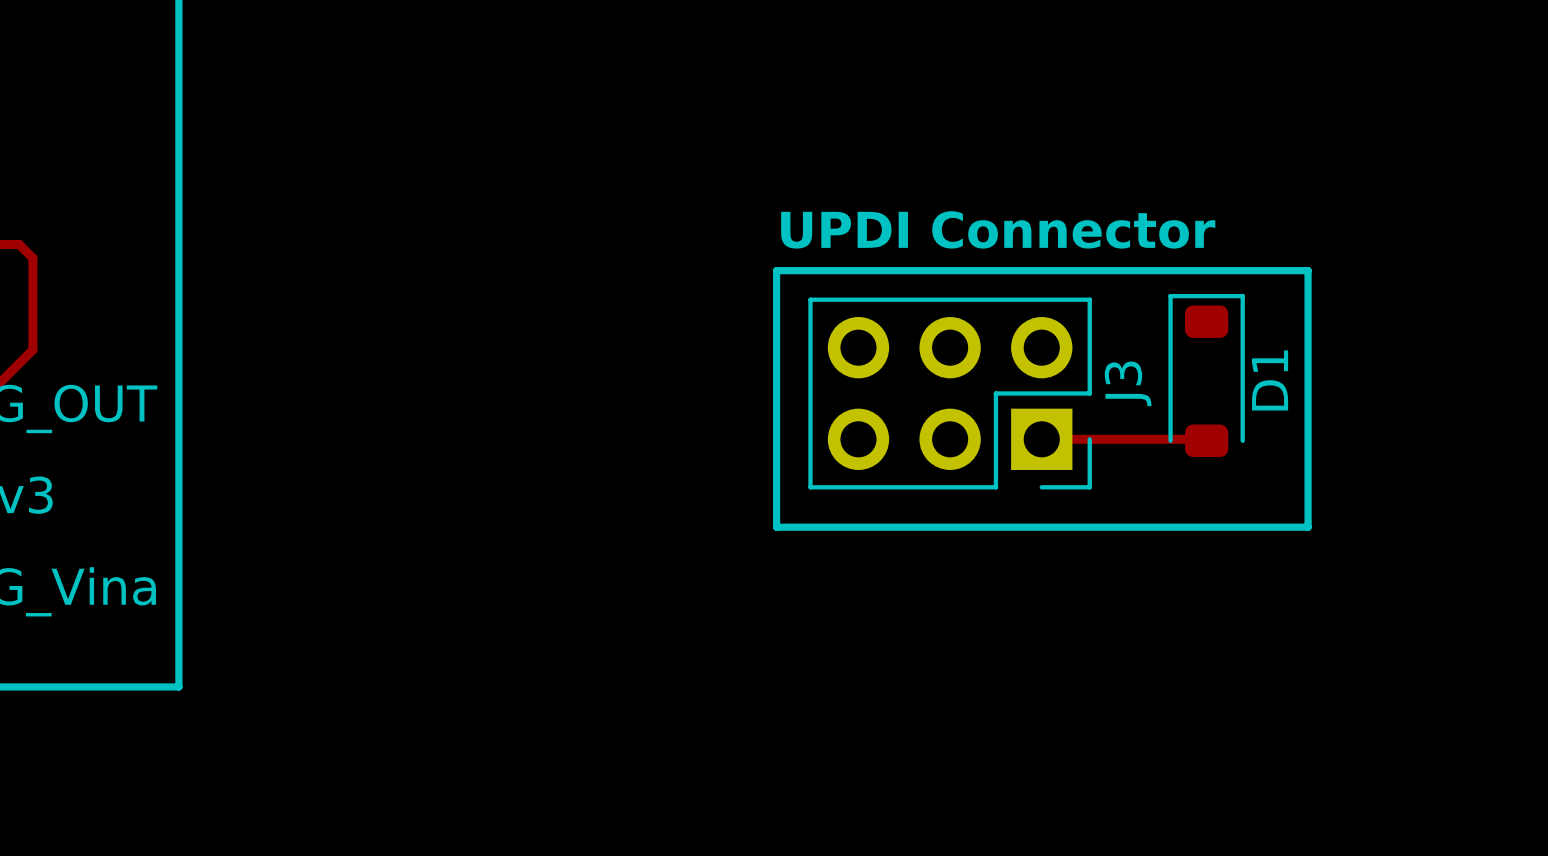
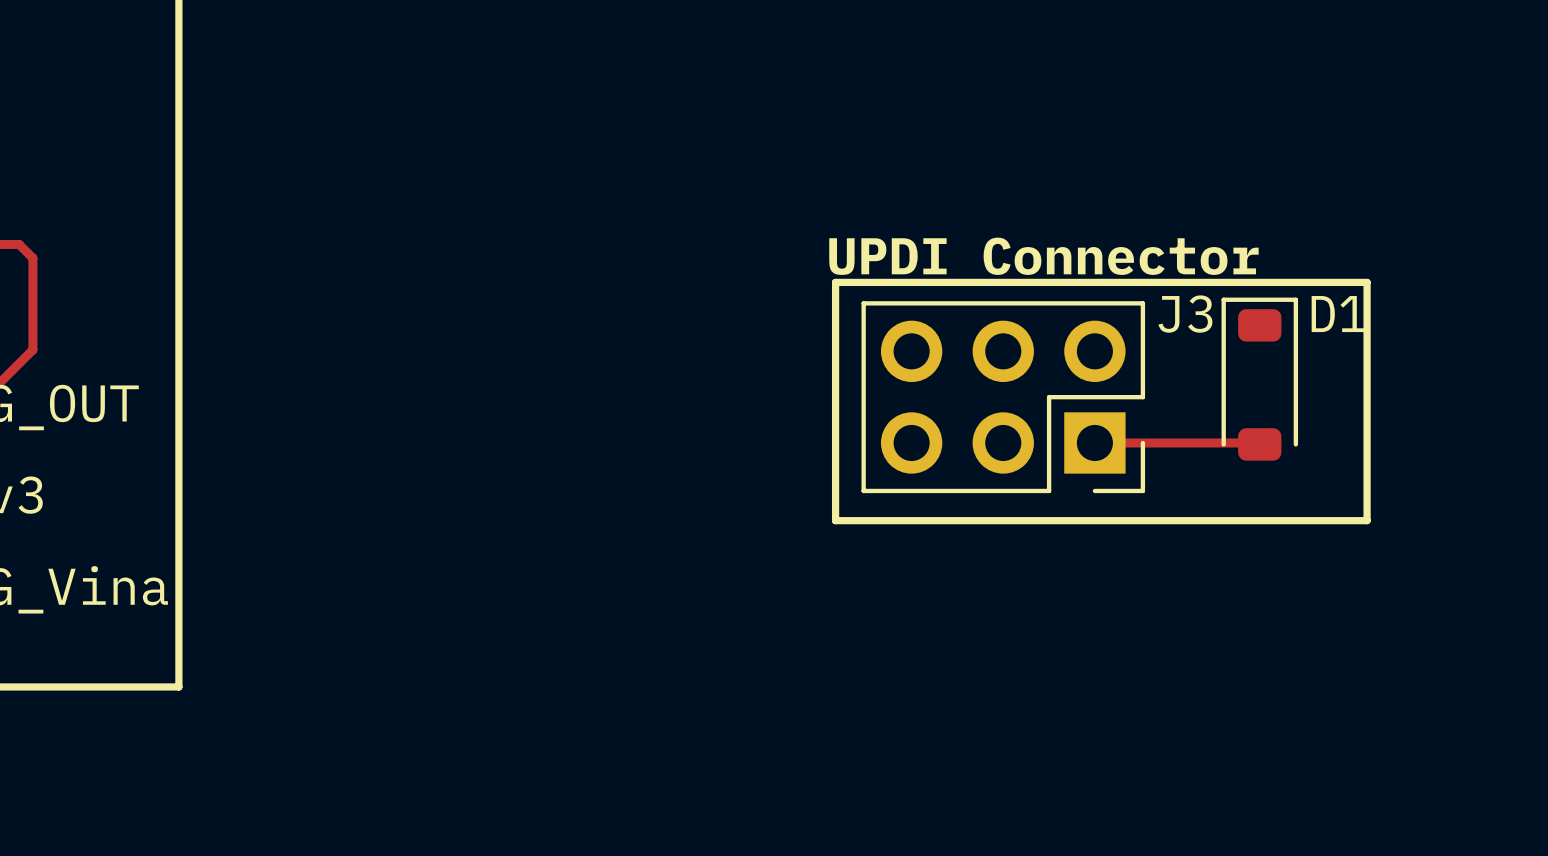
text position: UPDI Connector (998, 229) -> UPDI Connector (1043, 256)
line: (776, 270) (1308, 270) (1308, 527) (776, 527) (776, 270) -> (835, 282) (835, 520) (1367, 520) (1367, 282) (835, 282)
D1 position: (1206, 375) -> (1259, 379)
D1 name rotation: 0° (1270, 380) -> 90° clockwise (1338, 314)
J3 name rotation: 0° (1128, 383) -> 90° clockwise (1185, 314)
J3 position: (950, 393) -> (1003, 397)
track: (1041, 439) (1206, 440) -> (1094, 442) (1259, 444)

